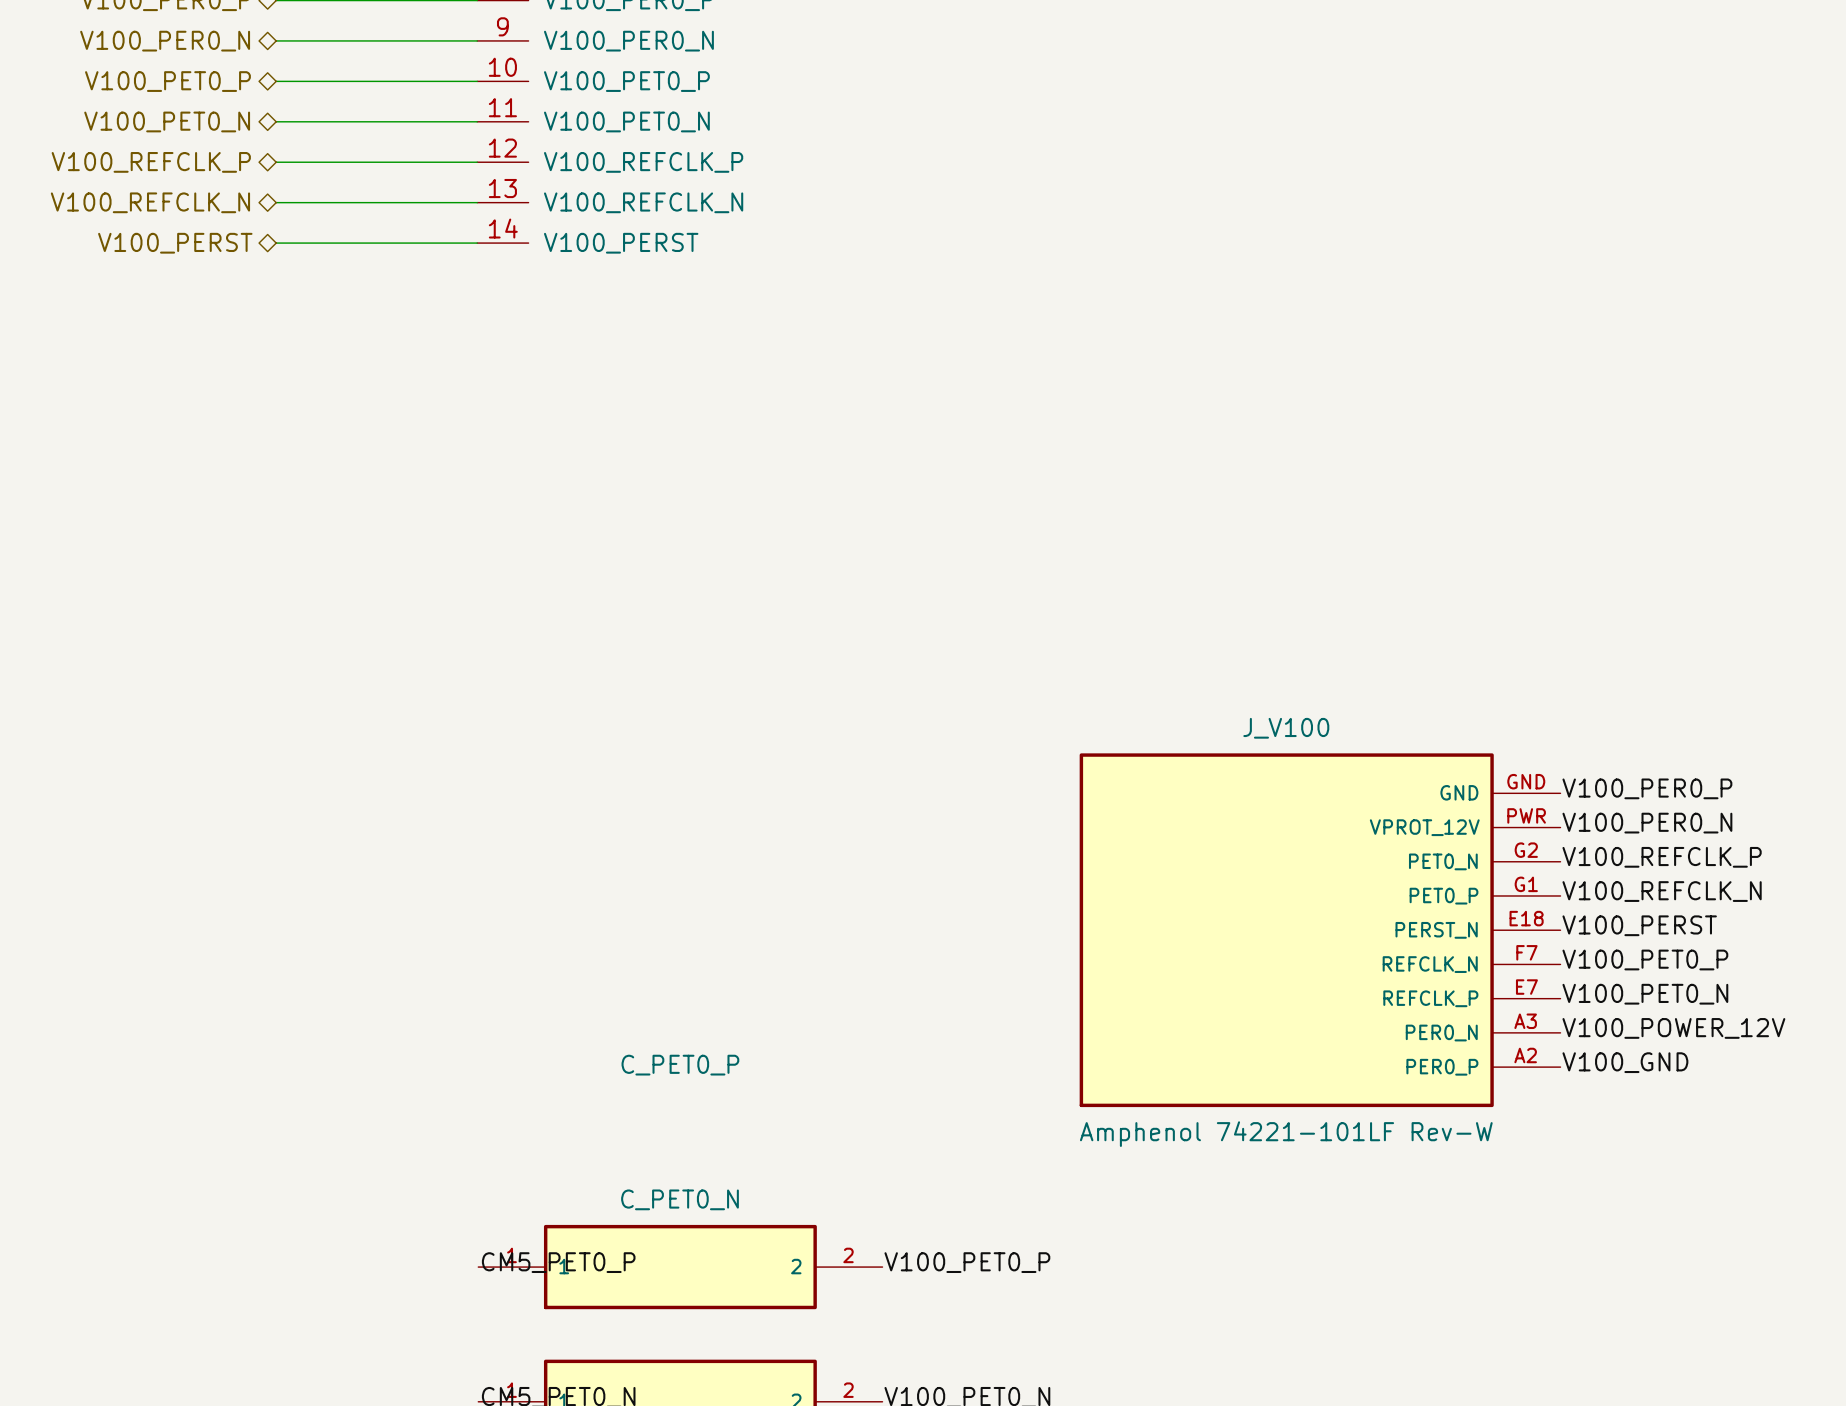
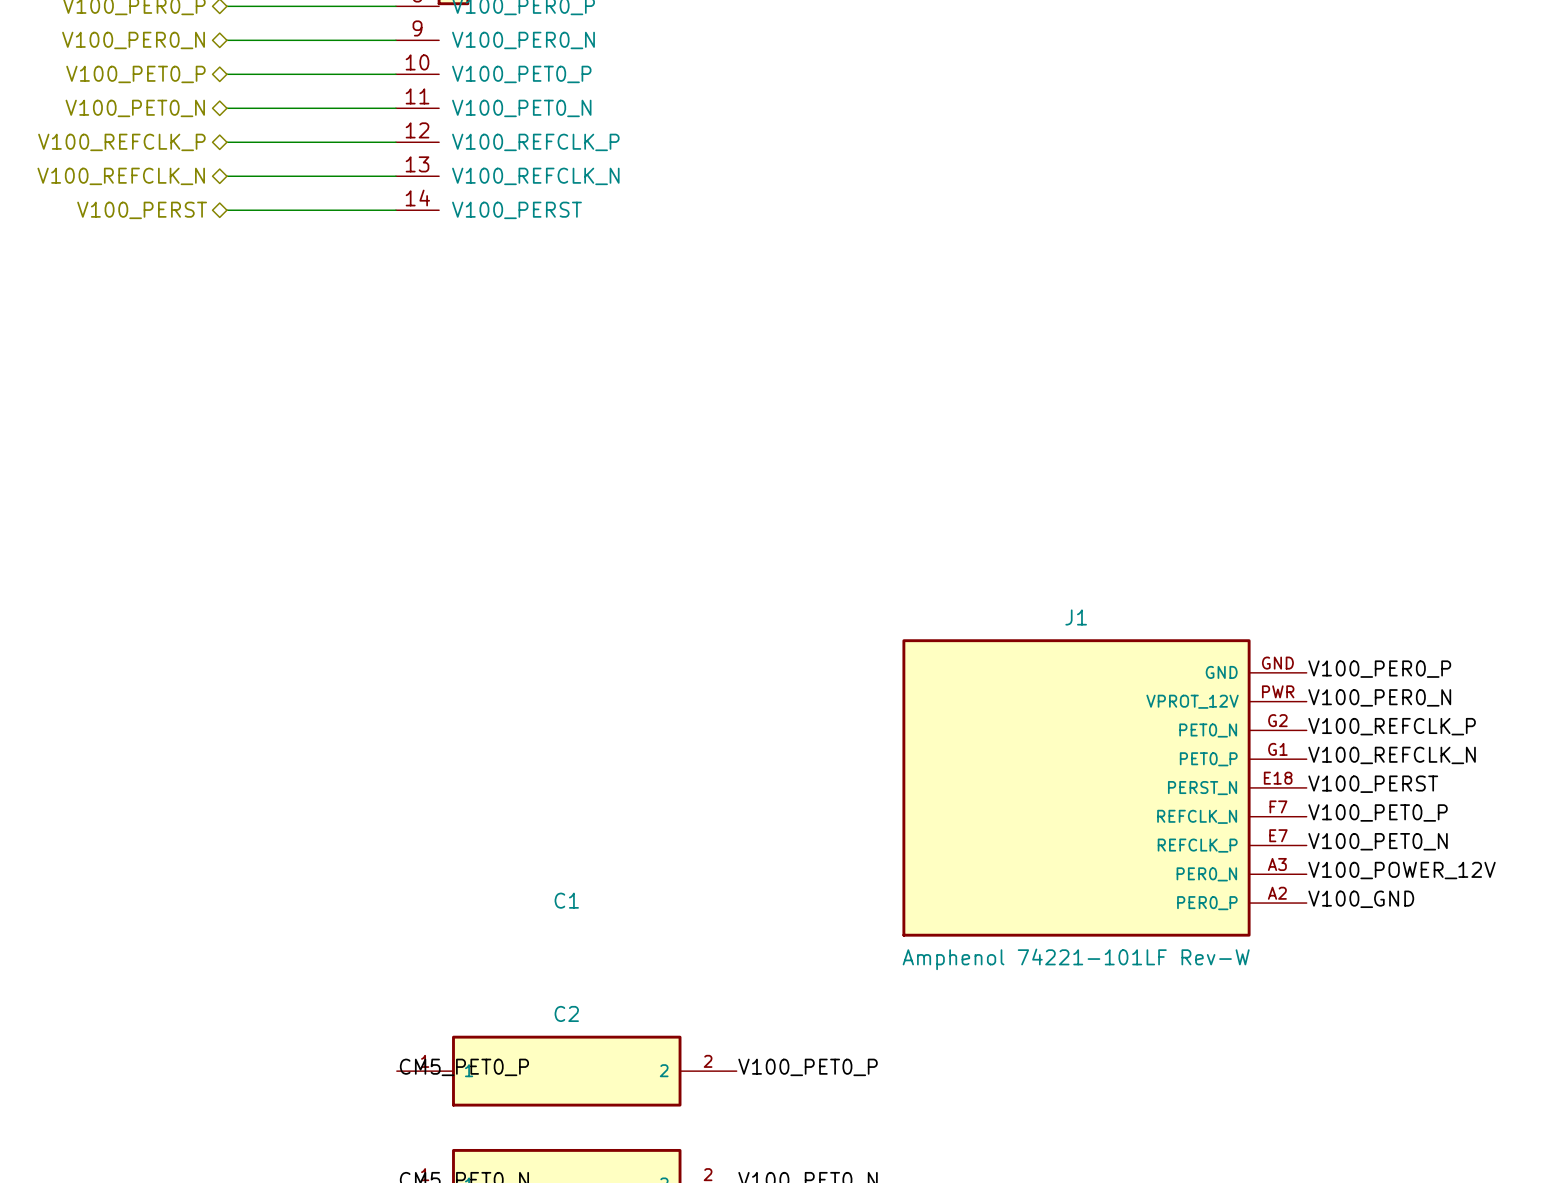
J_V100 name: J_V100 (1286, 728) -> J1 (1076, 617)
C_PET0_P name: C_PET0_P (680, 1065) -> C1 (566, 900)
C_PET0_N name: C_PET0_N (680, 1199) -> C2 (566, 1013)

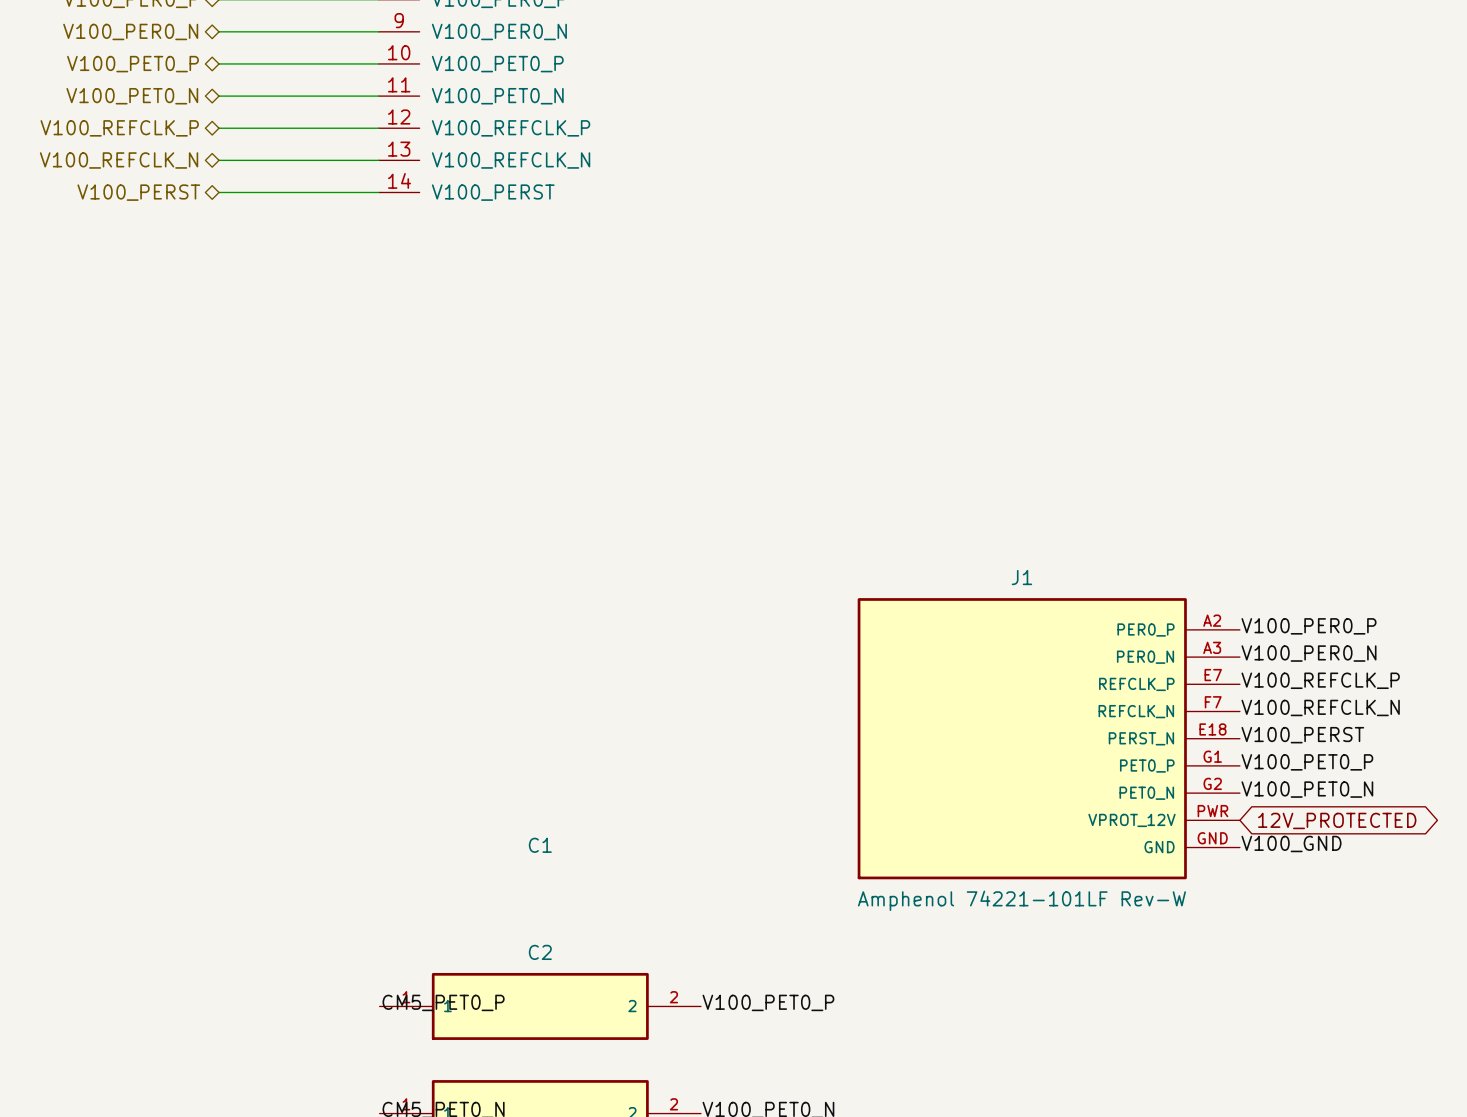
J1 flip: as is (1076, 787) -> up-down (1022, 738)
label: V100_POWER_12V (1402, 870) -> none
global label: none -> 12V_PROTECTED (1337, 820)

